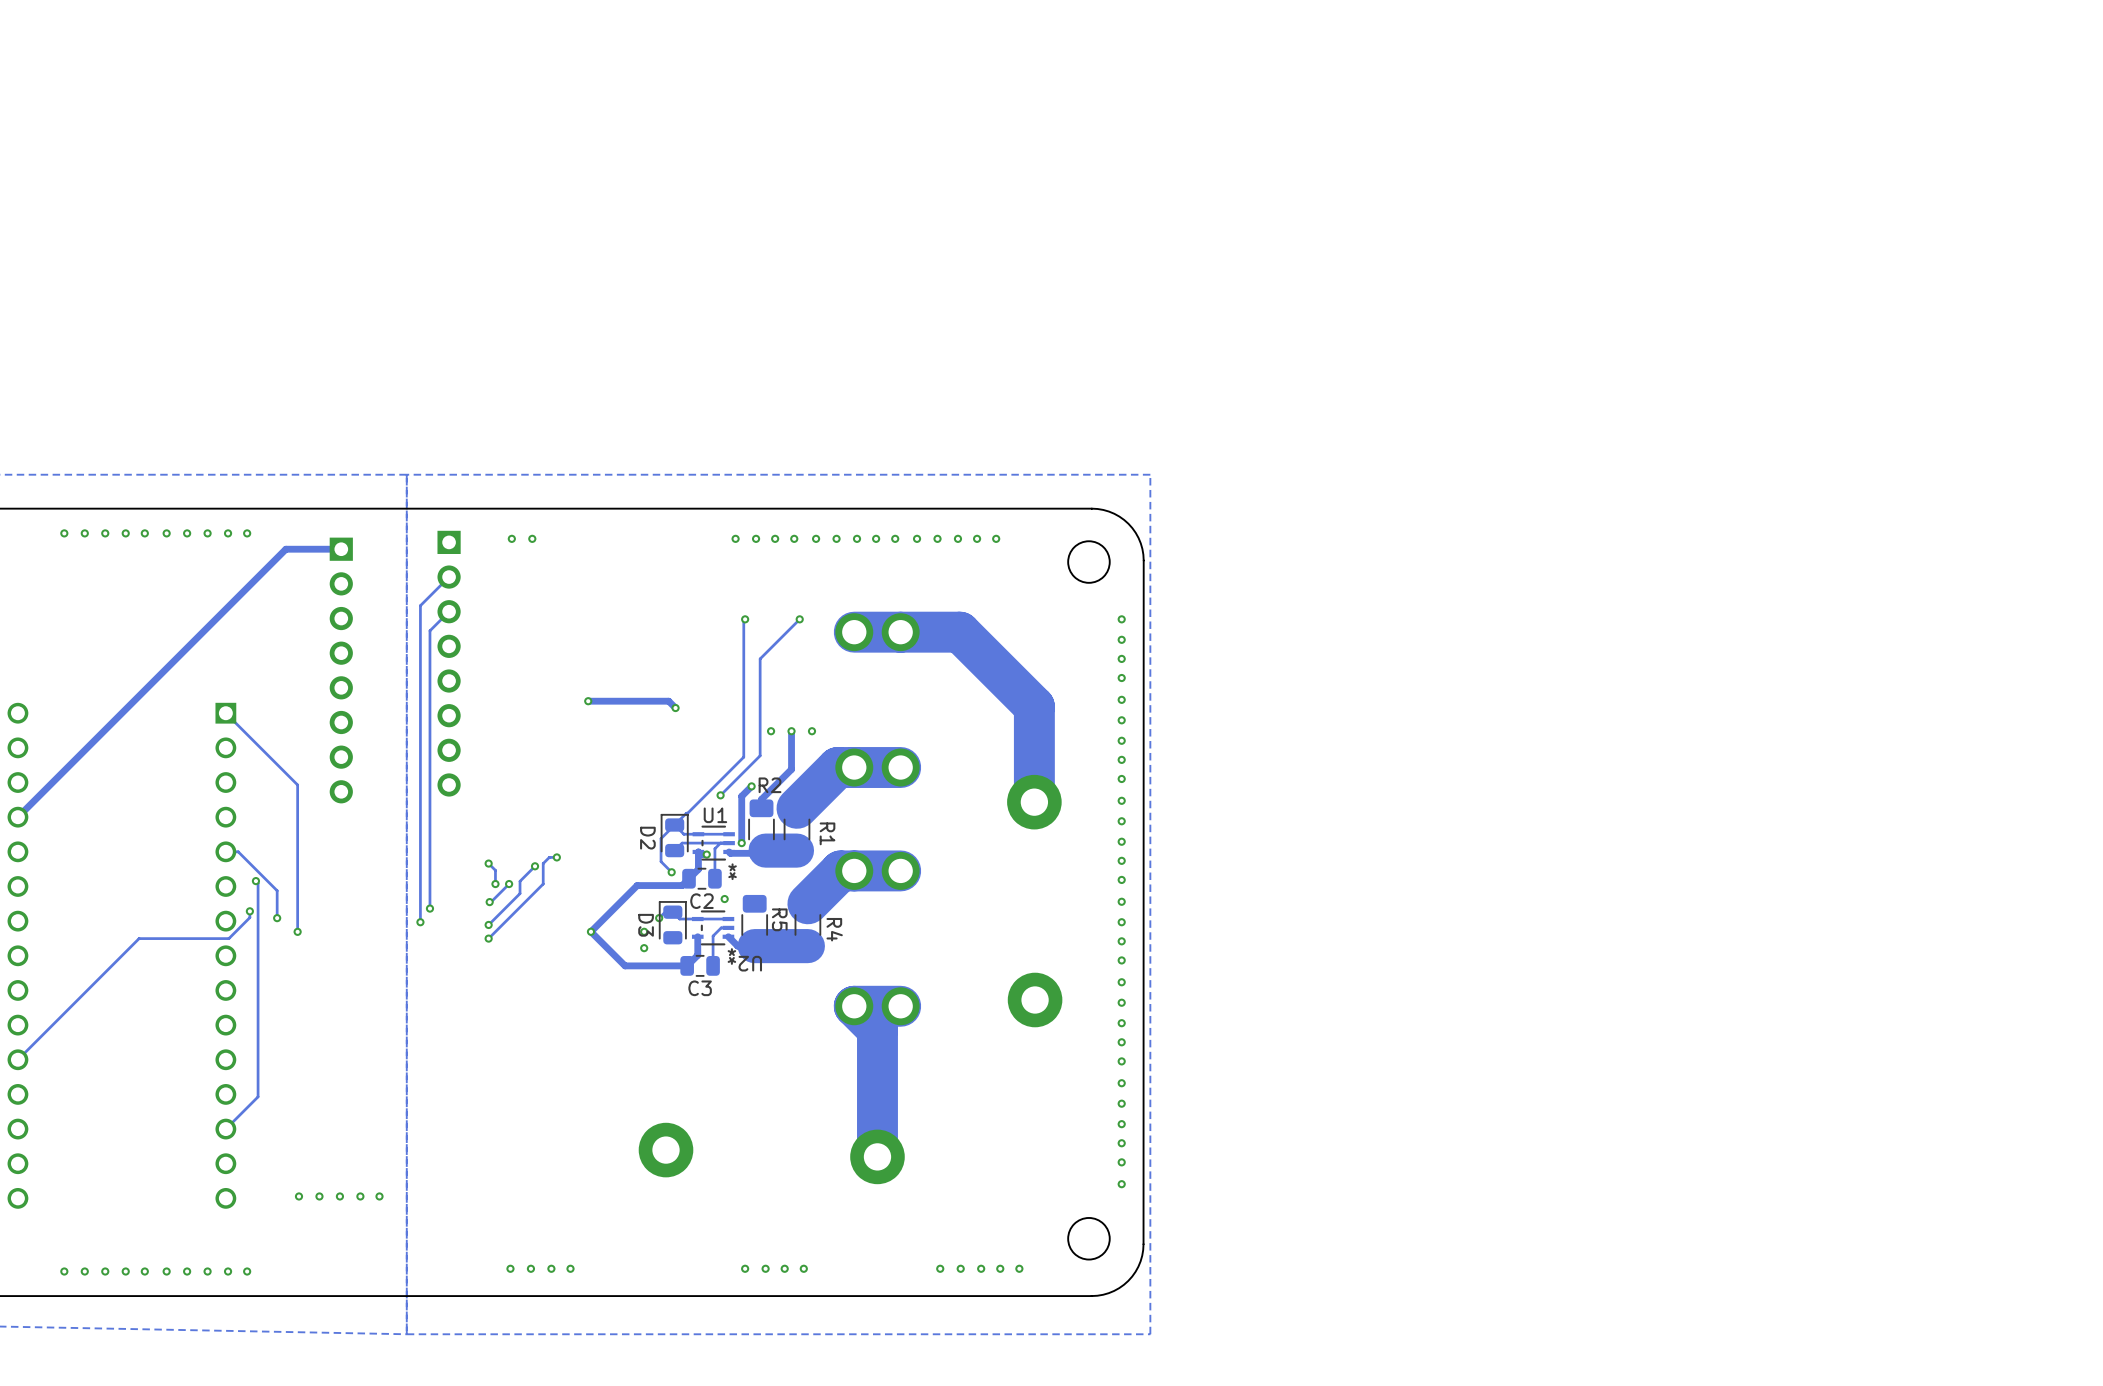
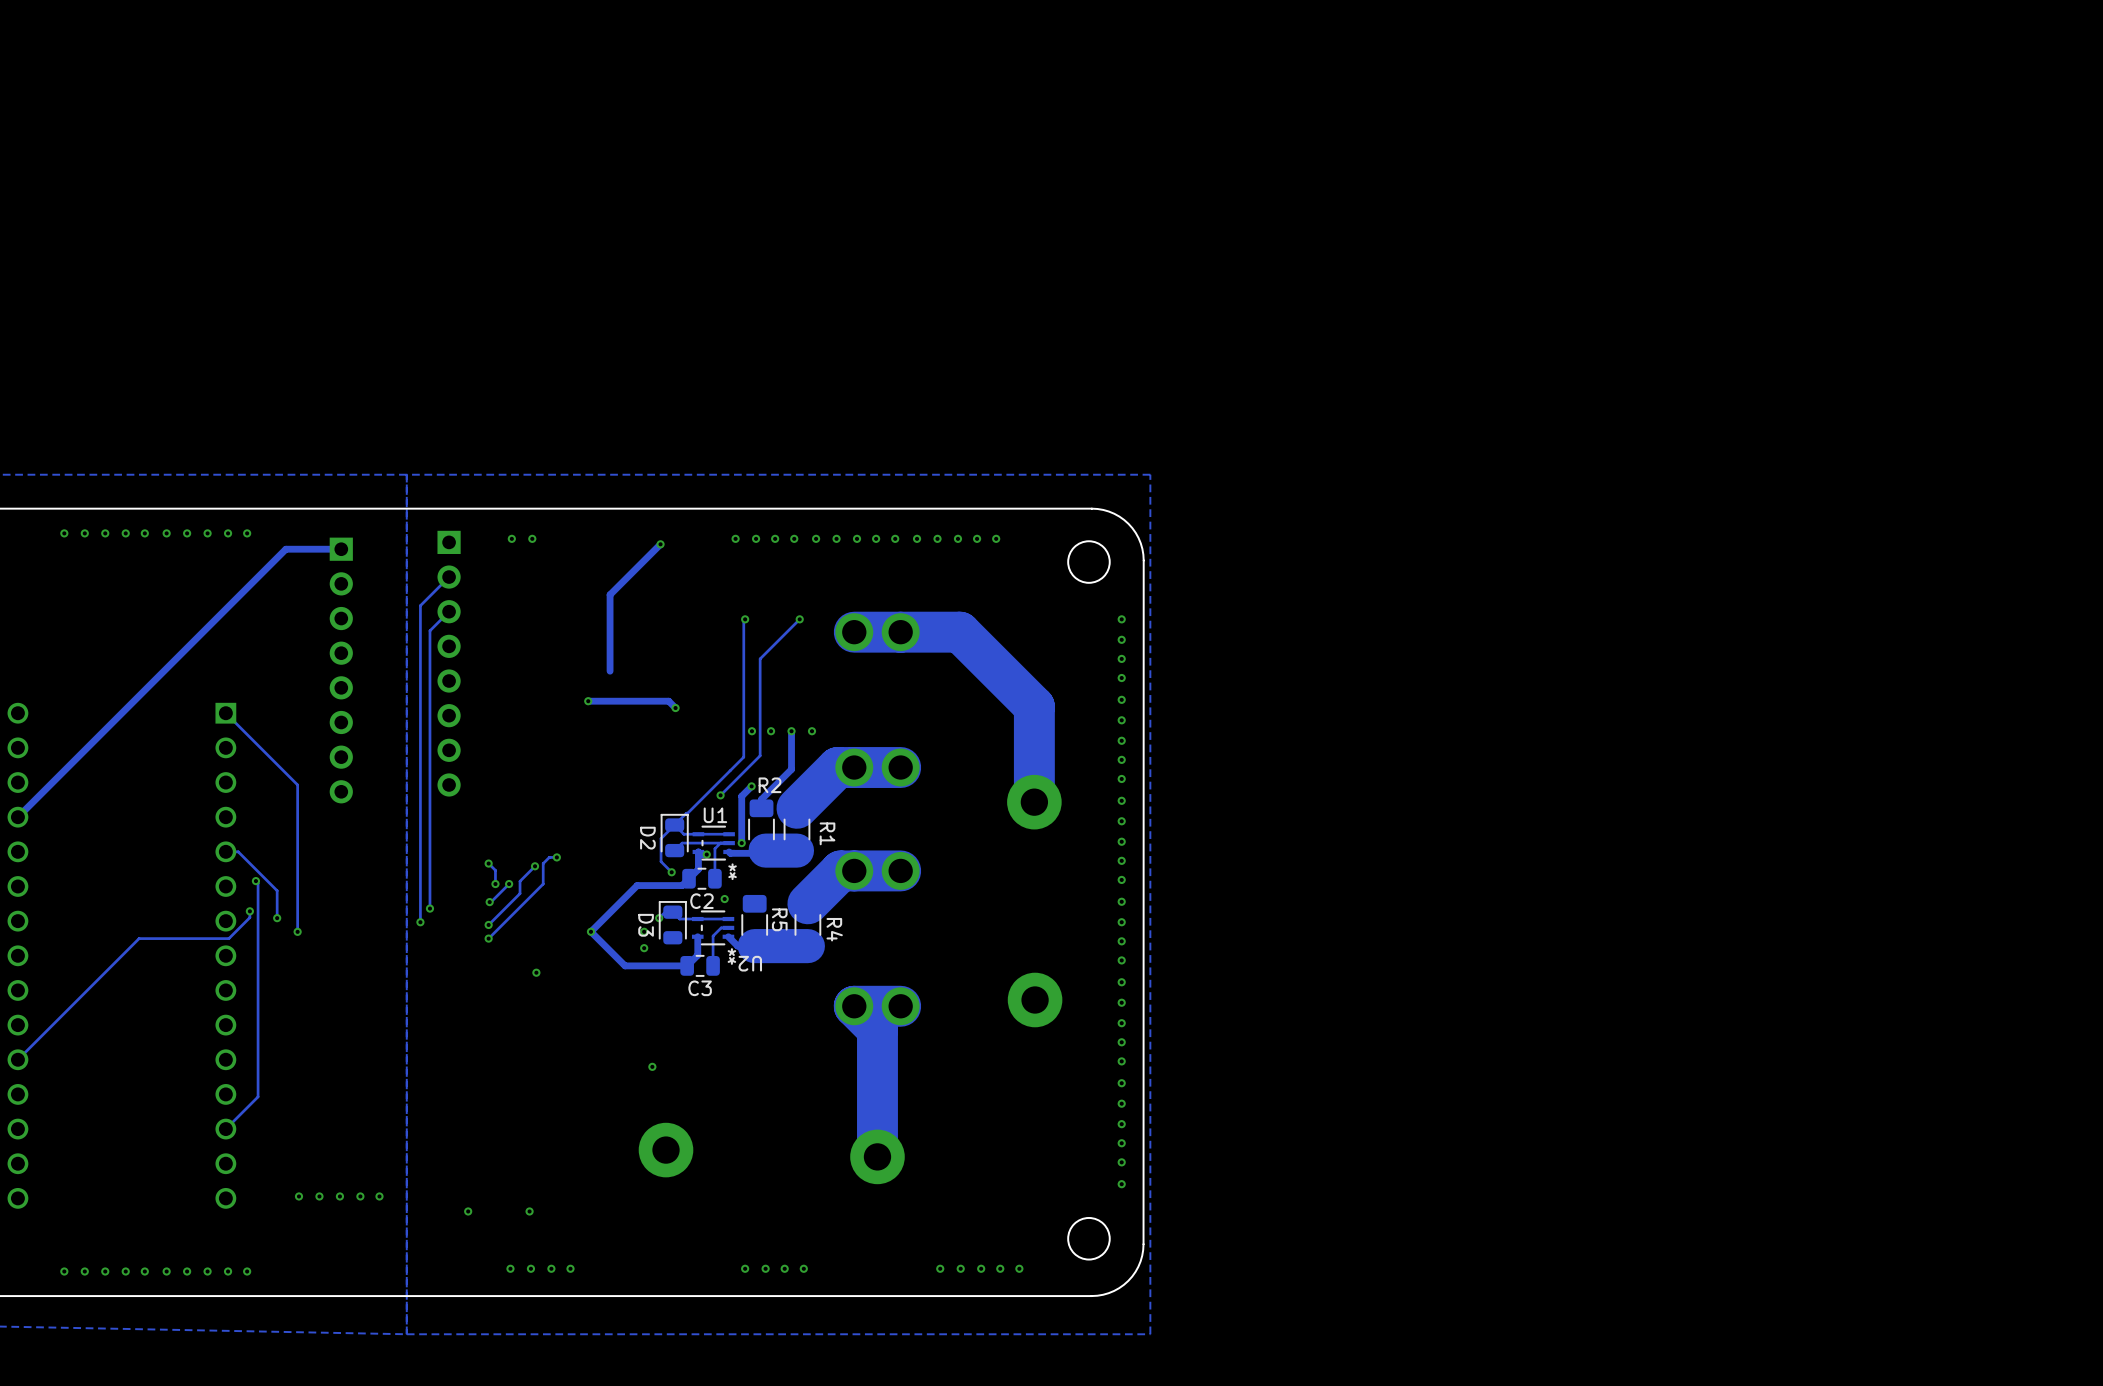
track: none -> (660, 544) (610, 594) (610, 671)
via: none -> (660, 544)
via: none -> (751, 731)
via: none -> (536, 972)
via: none -> (652, 1066)
via: none -> (468, 1211)
via: none -> (529, 1211)

